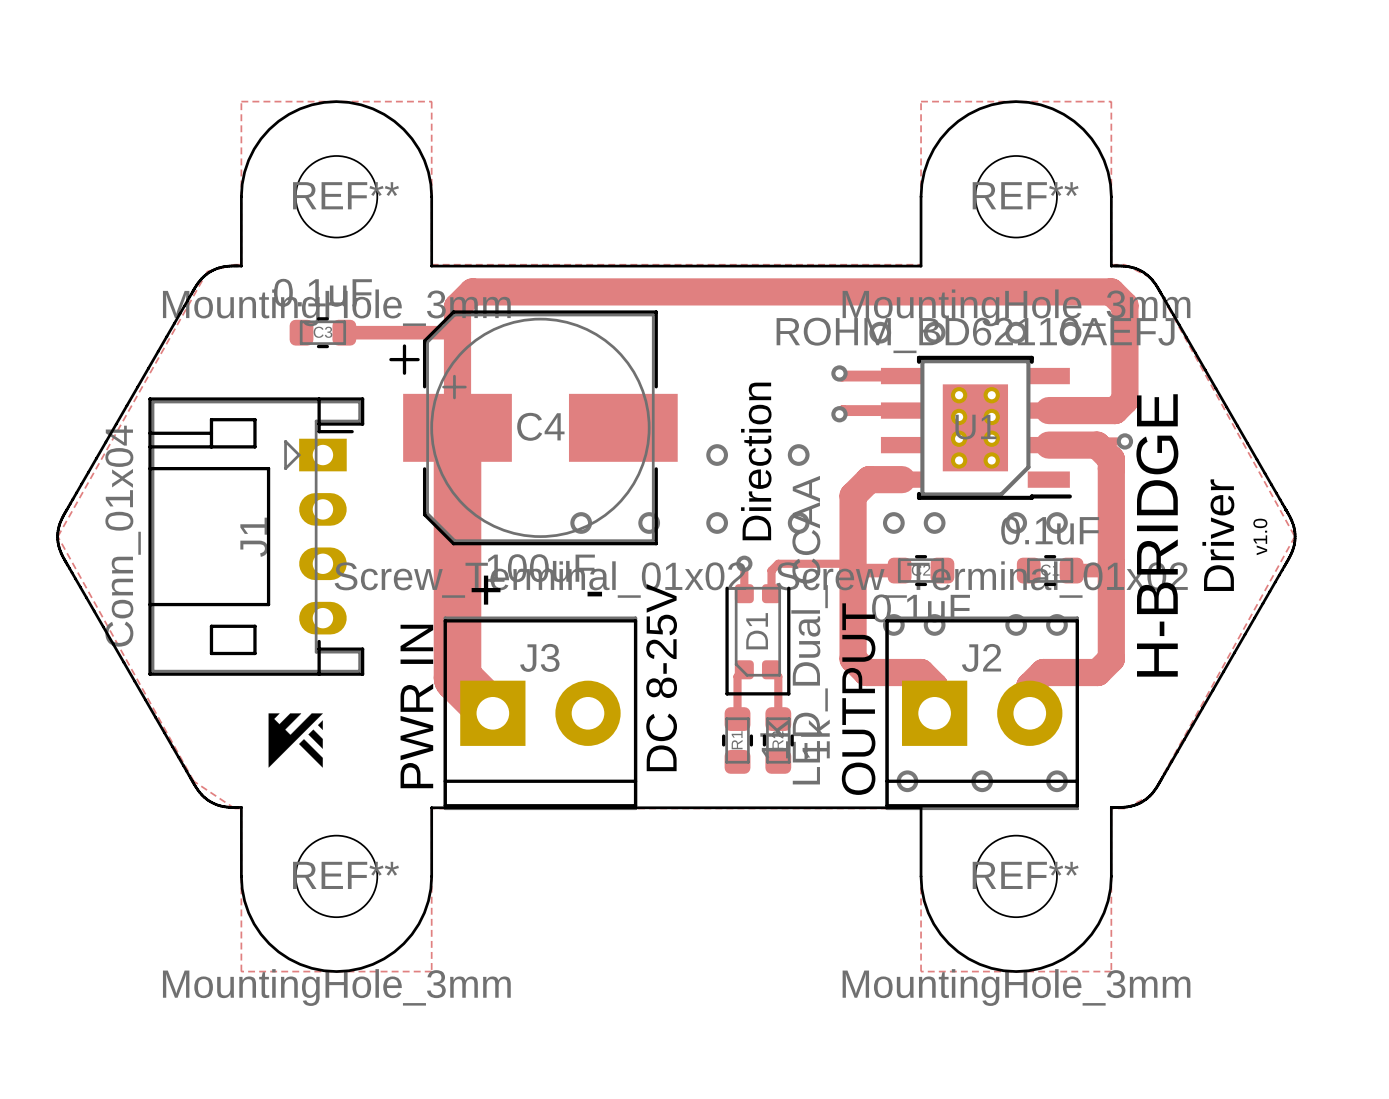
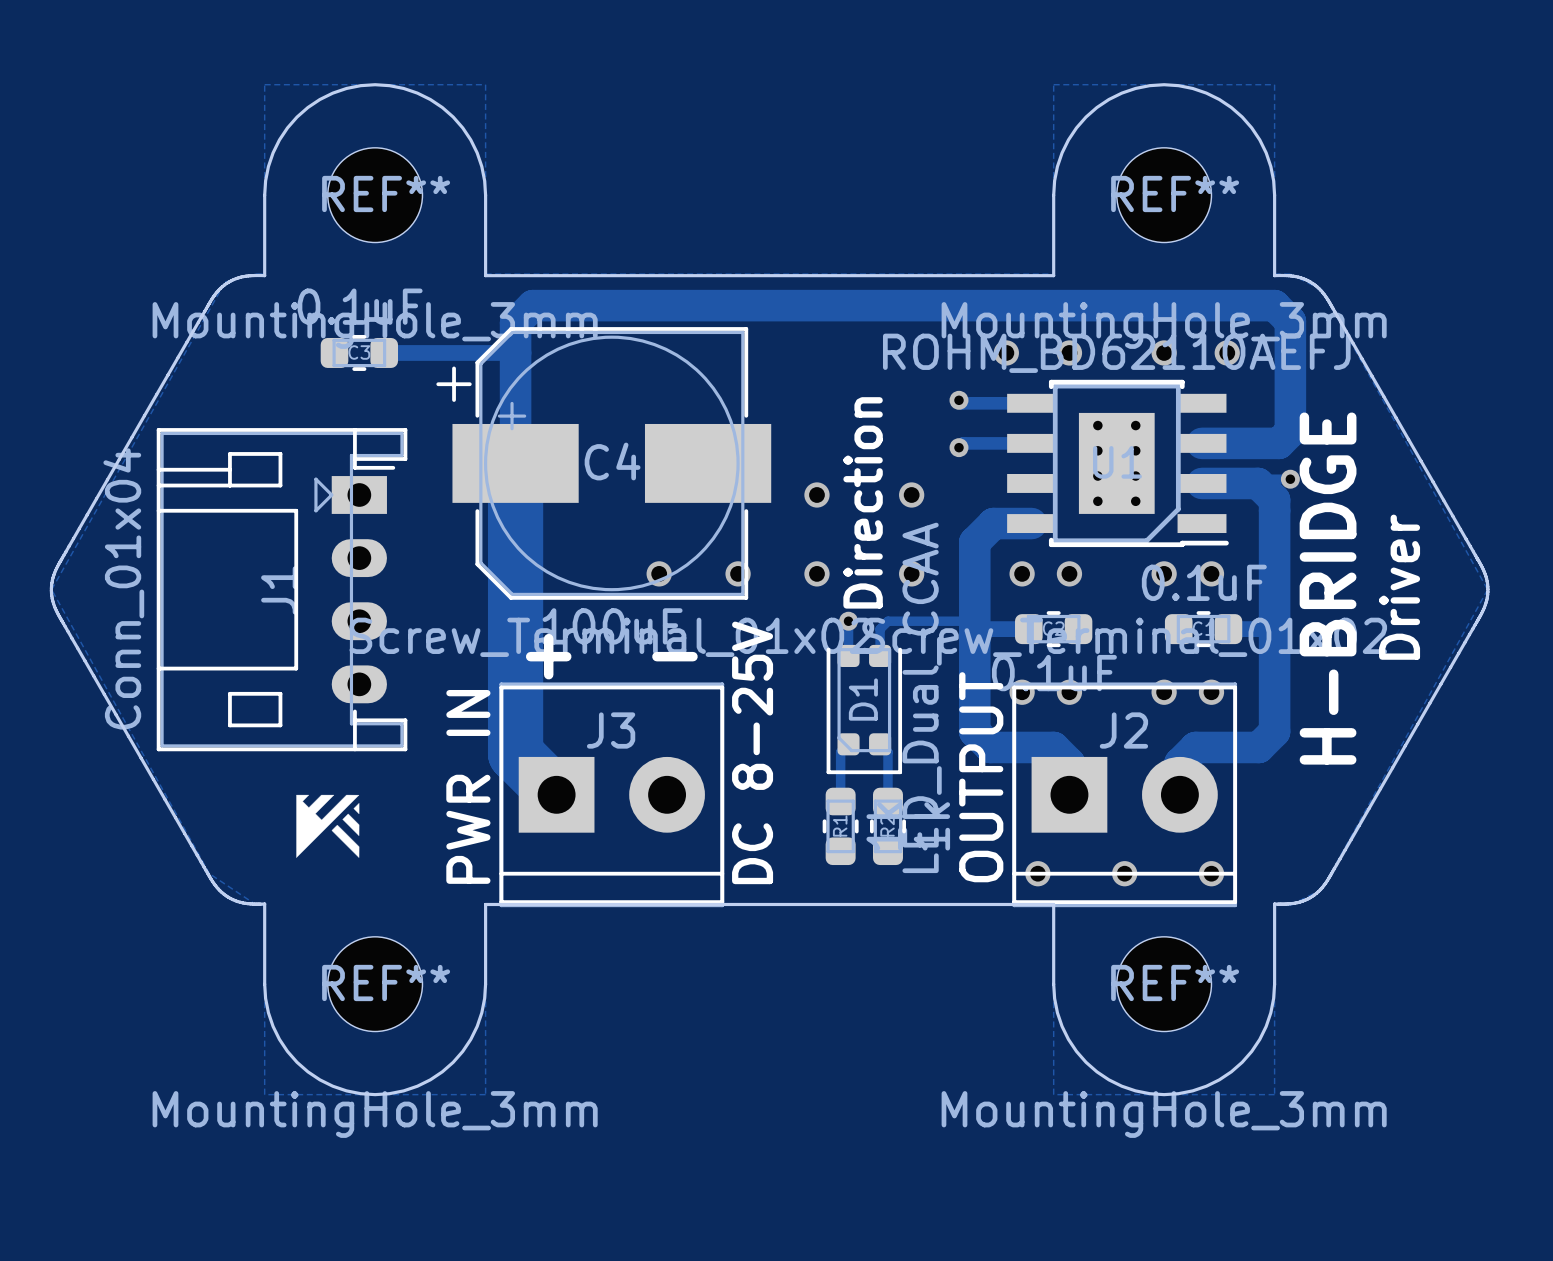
text: v1.0 (1260, 536) -> none

